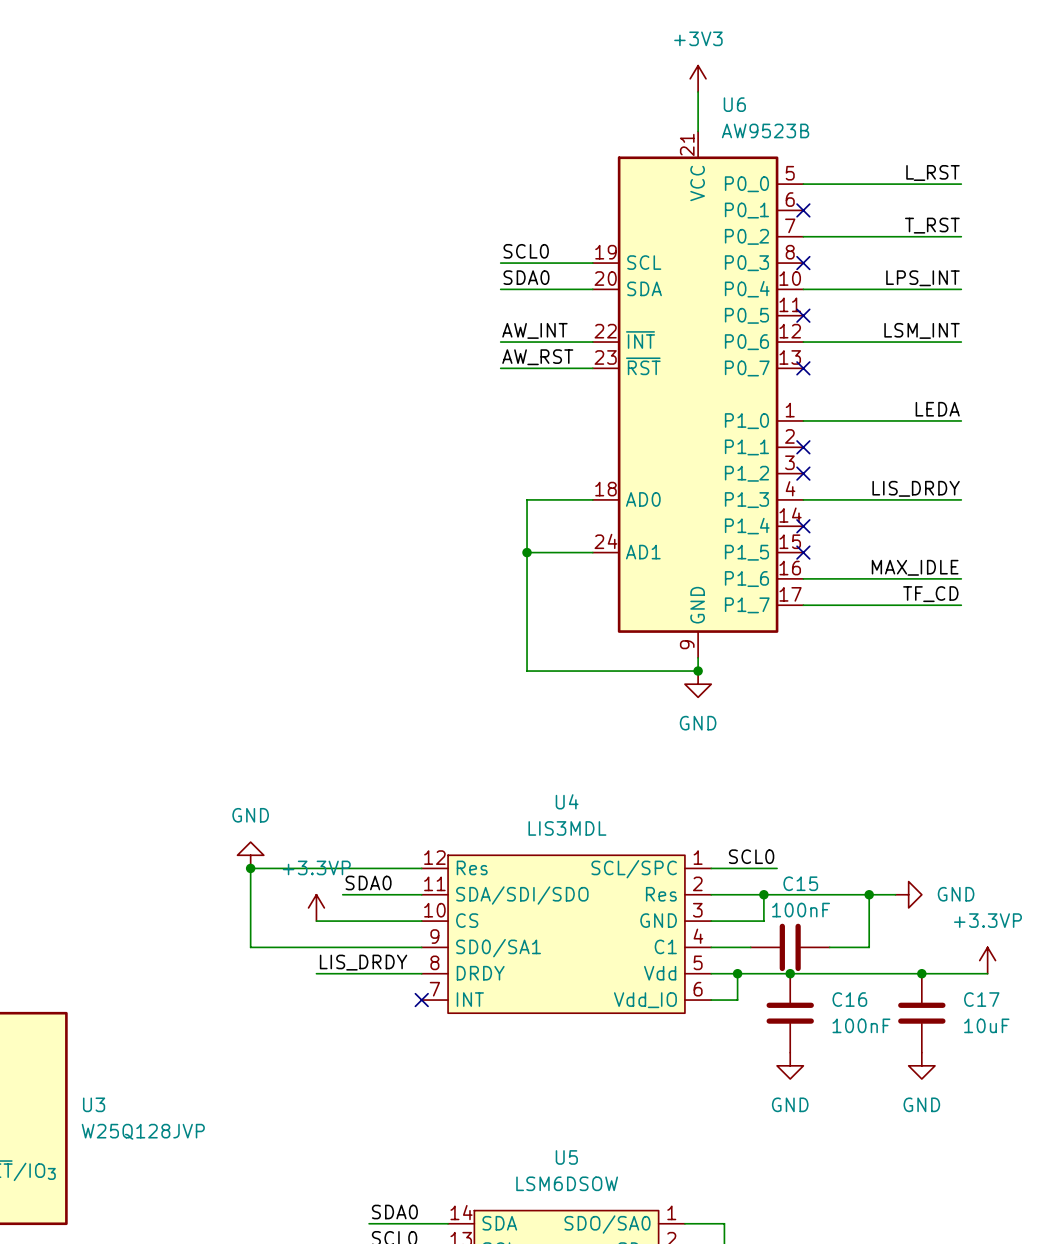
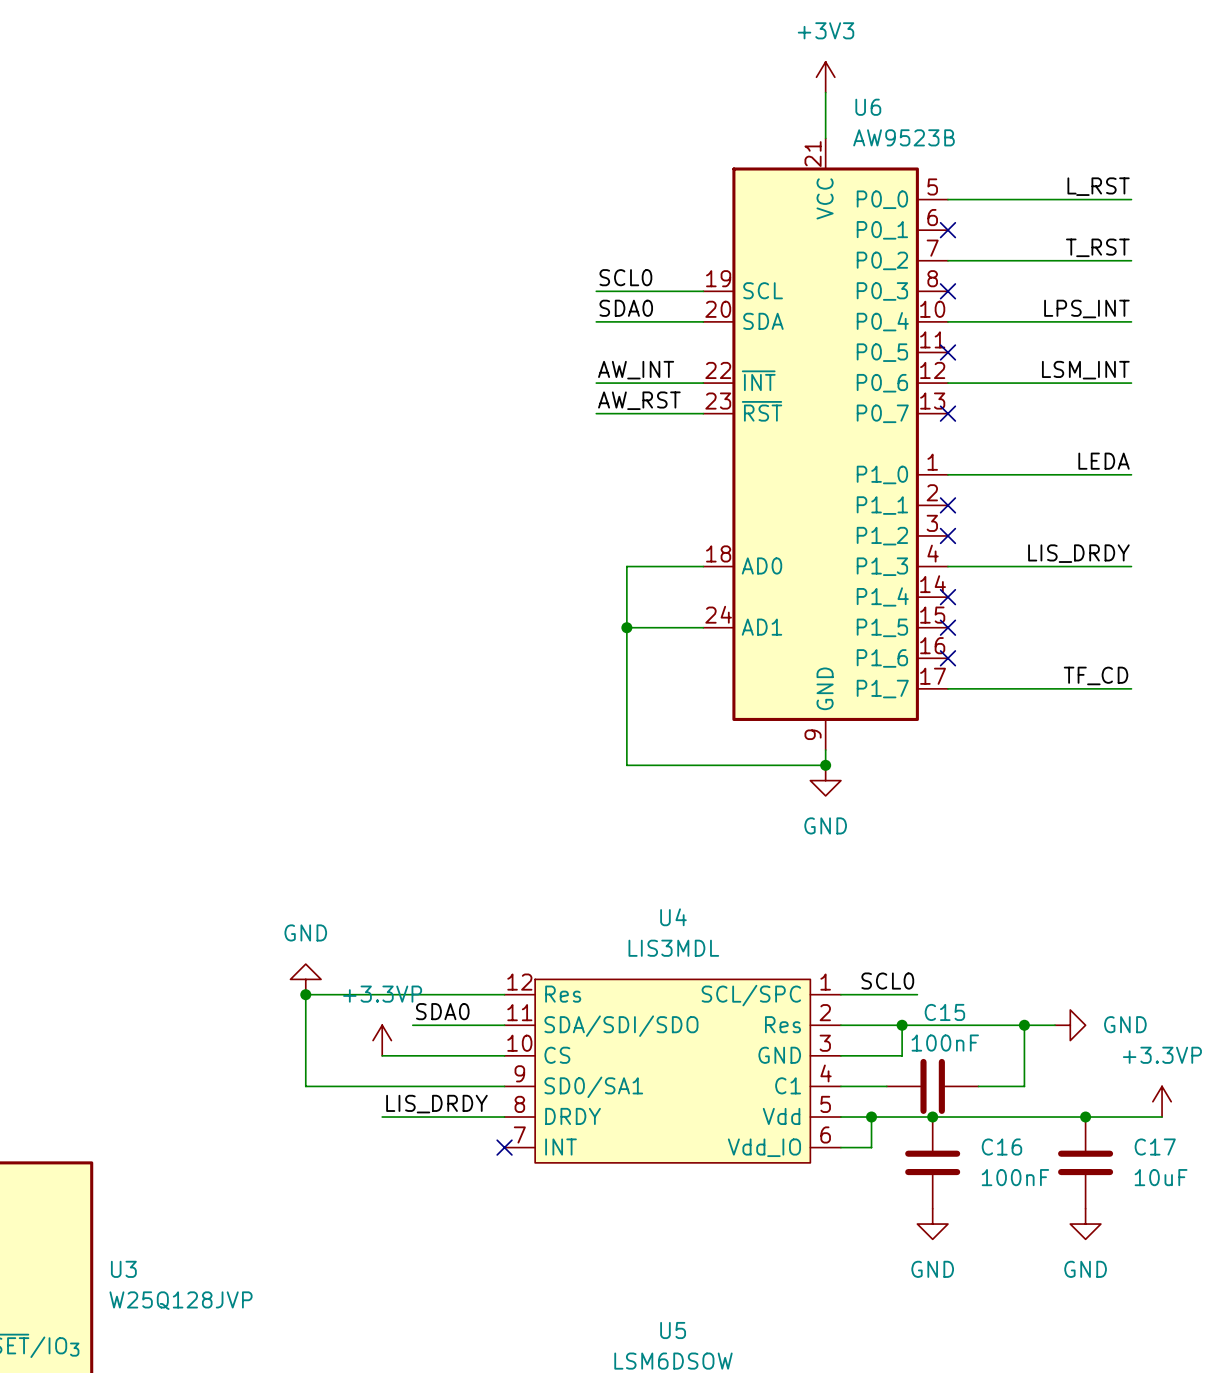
label: MAX_IDLE (915, 567) -> none
wire: (803, 578) (961, 578) -> none
no-connect mark: none -> (947, 658)

